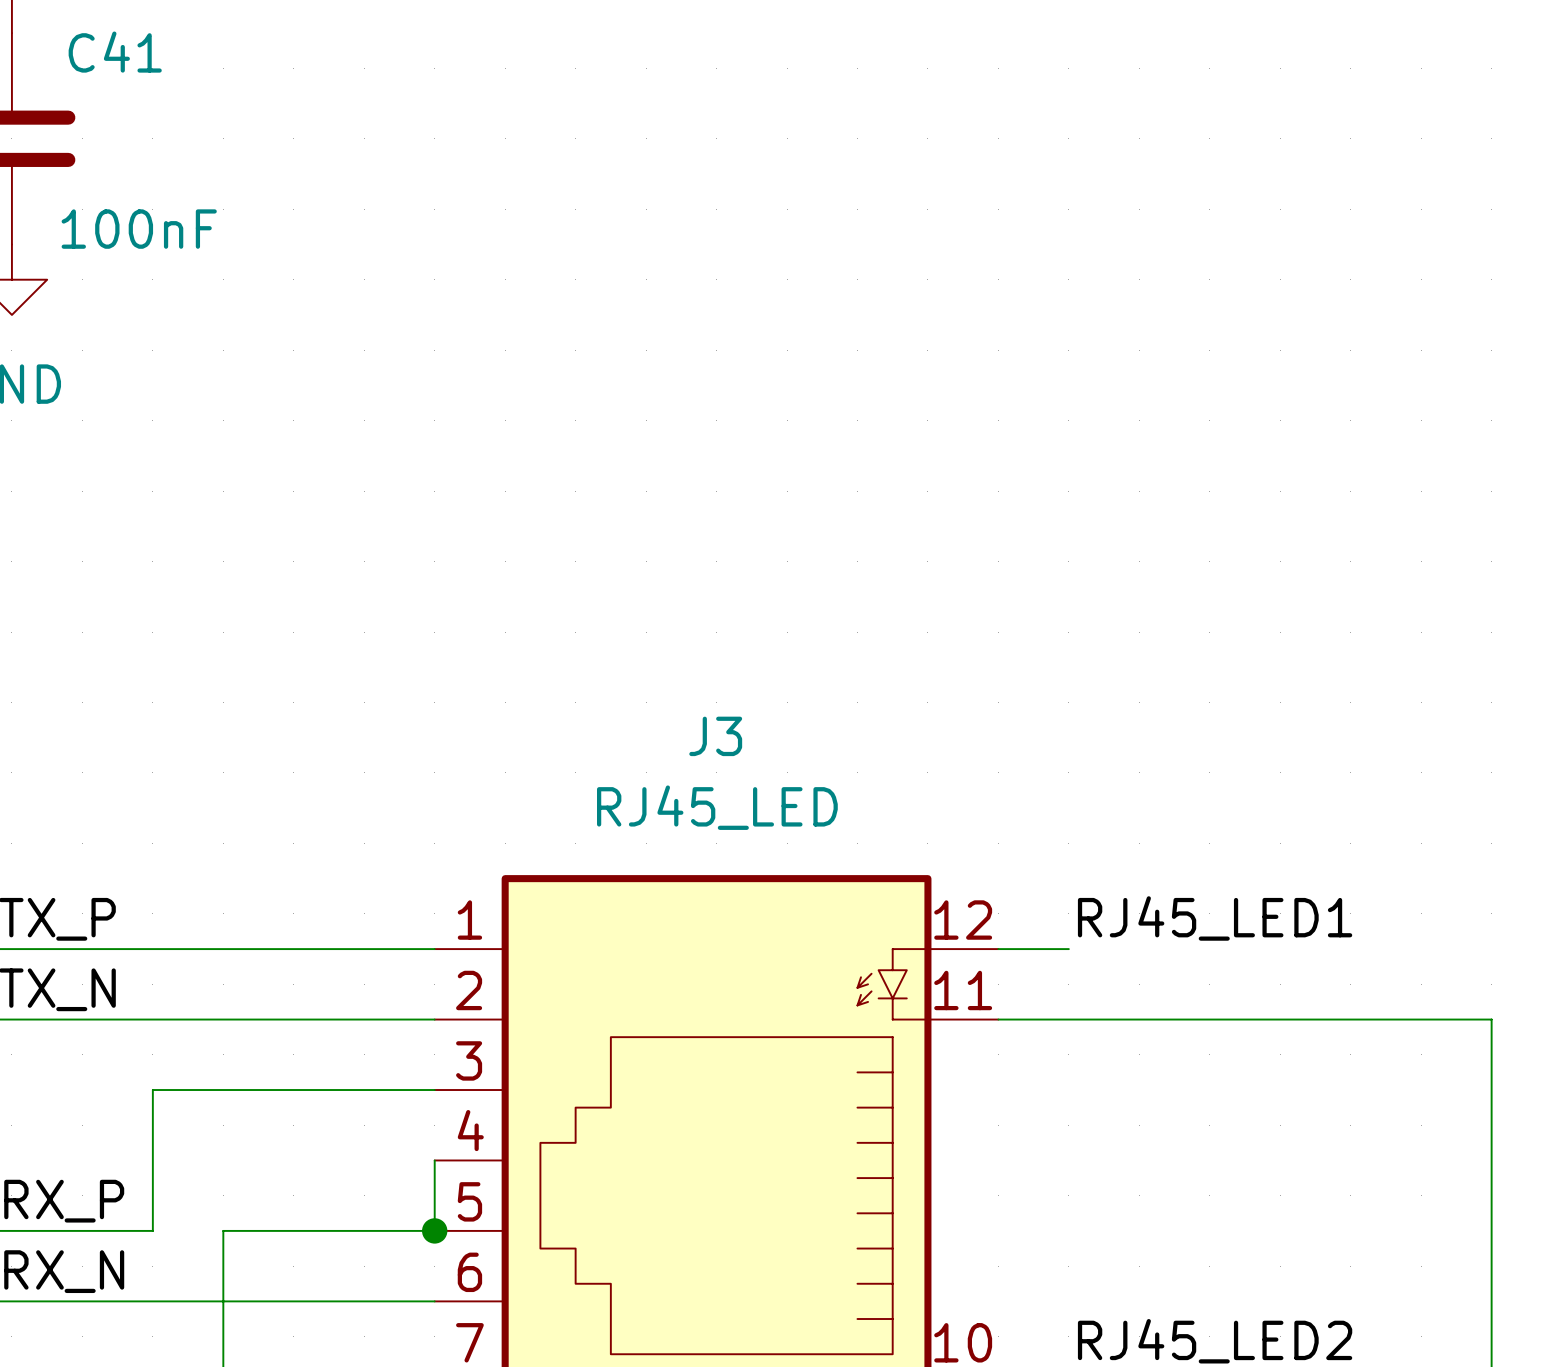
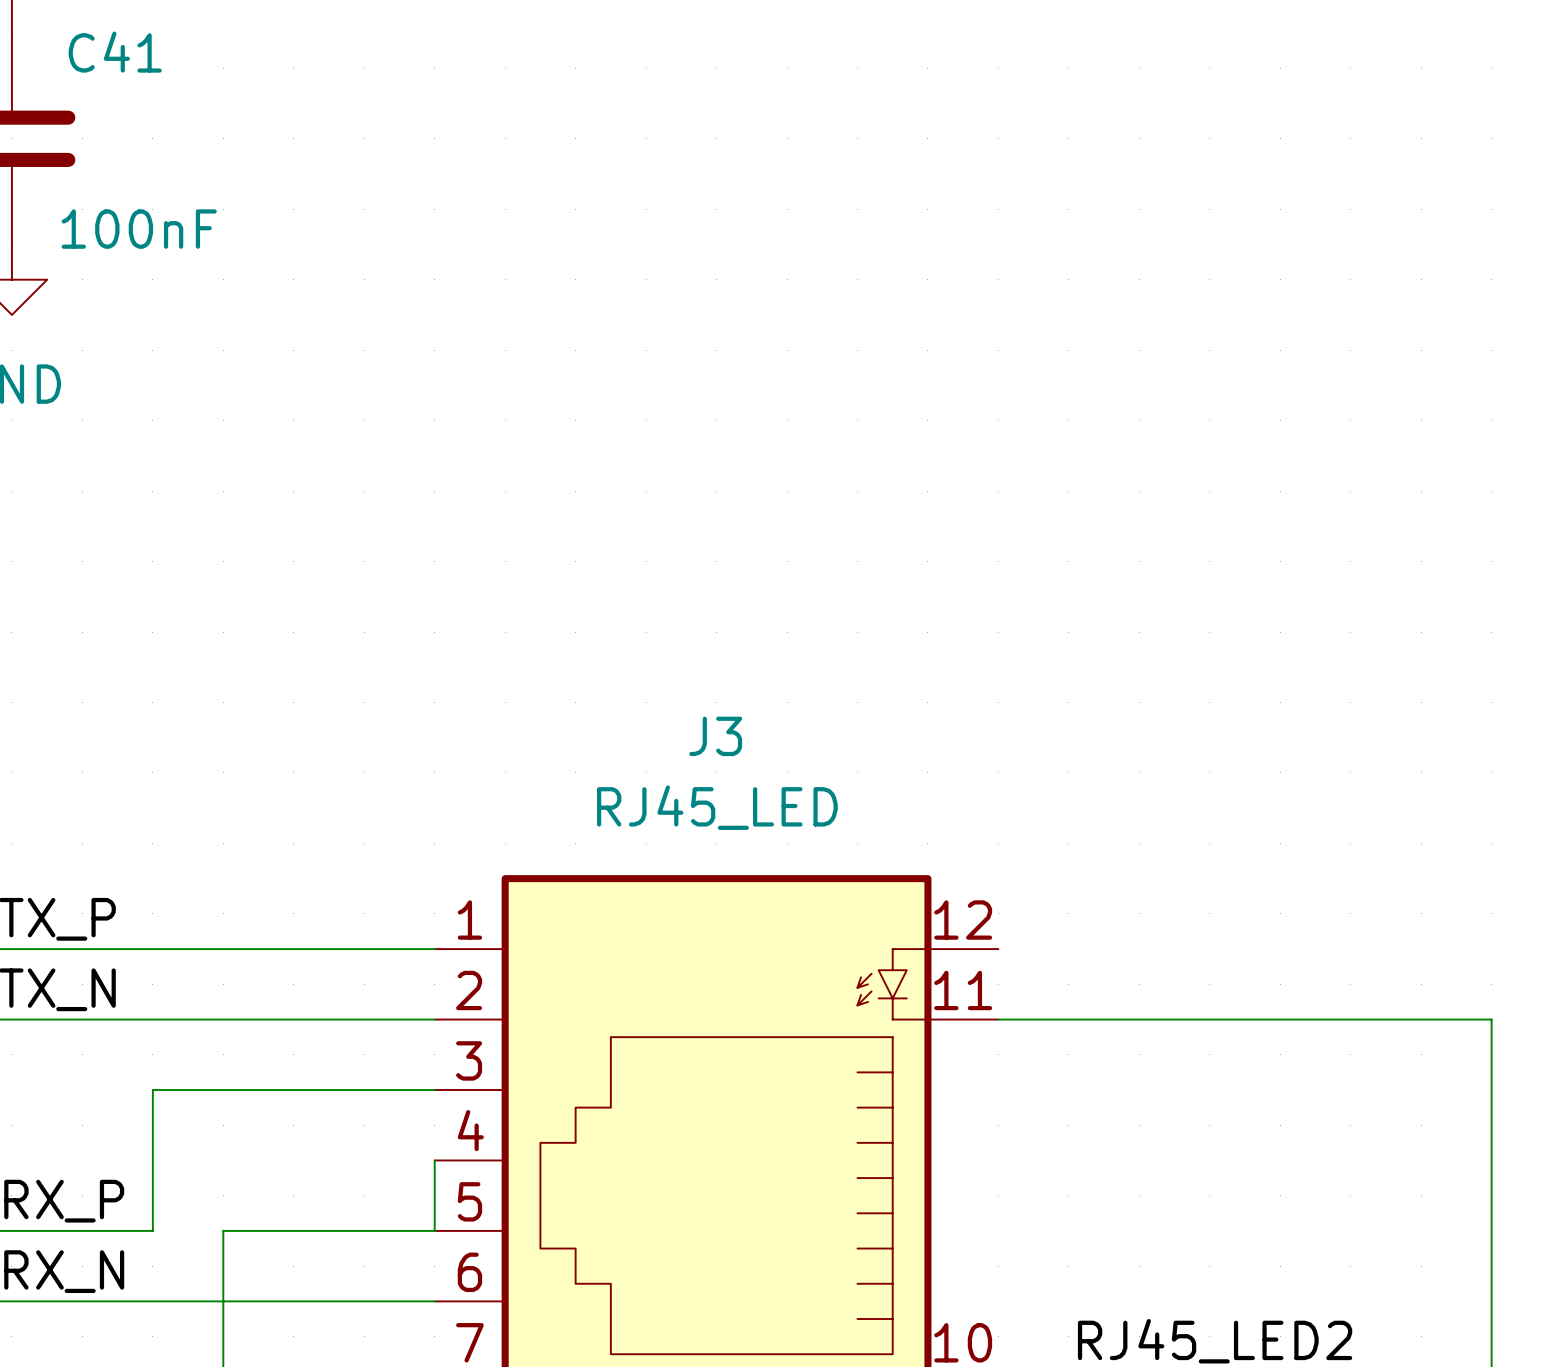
label: RJ45_LED1 (1215, 918) -> none
wire: (998, 949) (1068, 949) -> none
junction: (434, 1230) -> none

